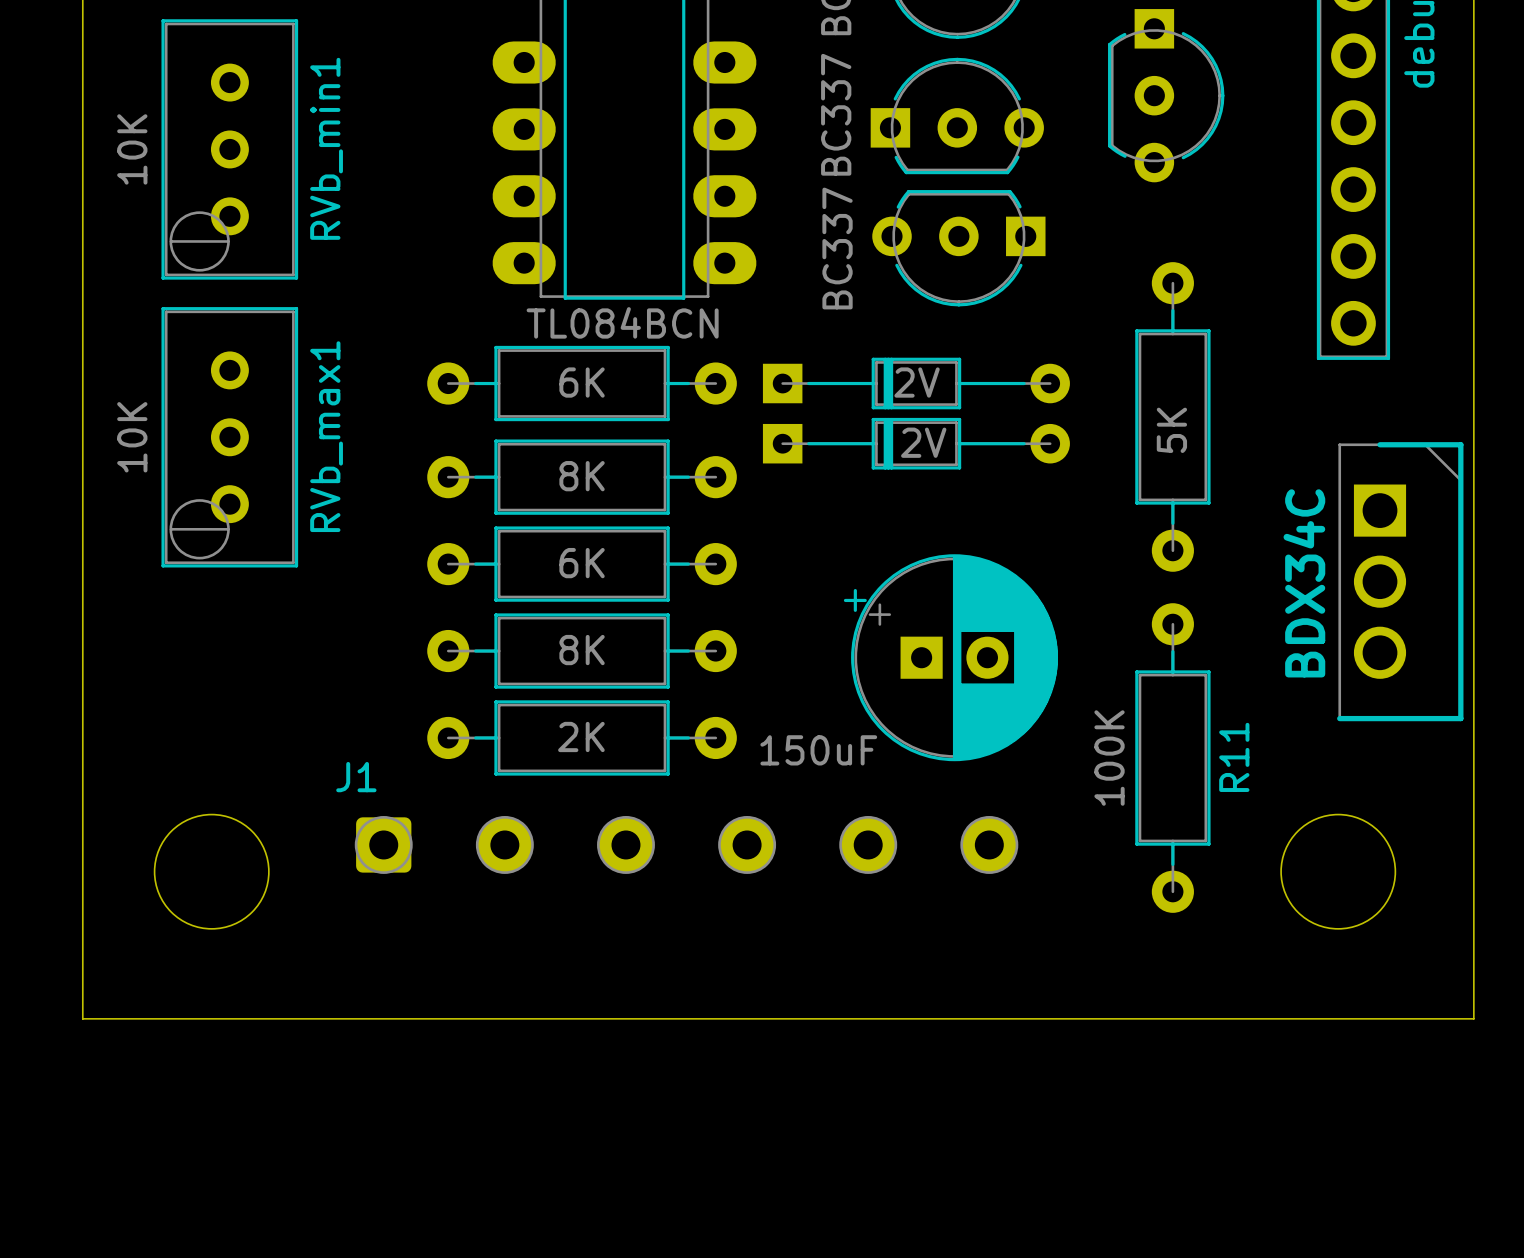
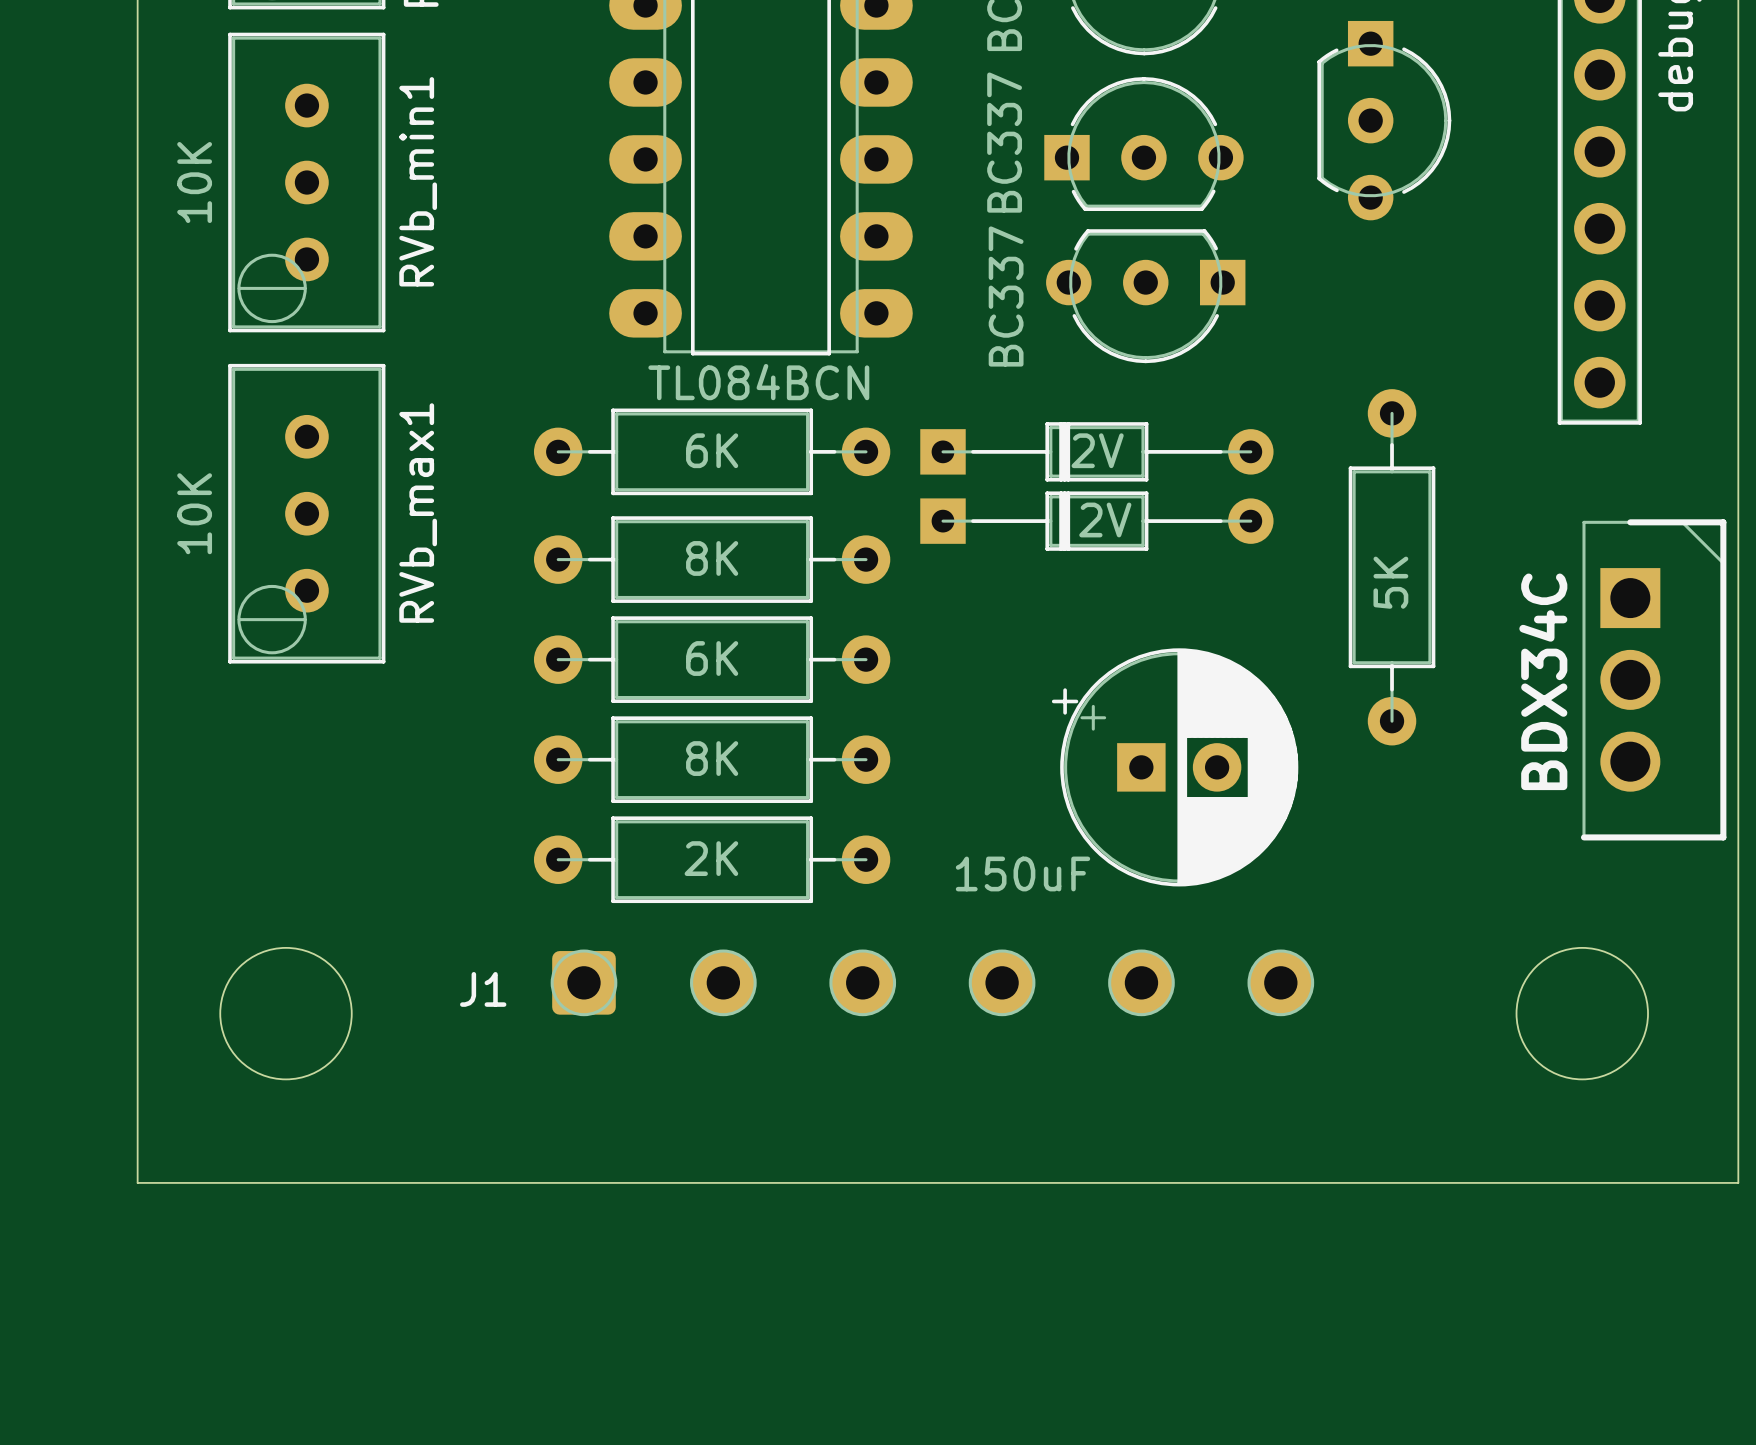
part position: (1172, 416) -> (1392, 567)
part position: (950, 657) -> (1175, 767)
R11: 100K (1172, 758) -> none
J1 name position: J1 (356, 777) -> J1 (483, 989)
J1 position: (686, 844) -> (932, 982)

